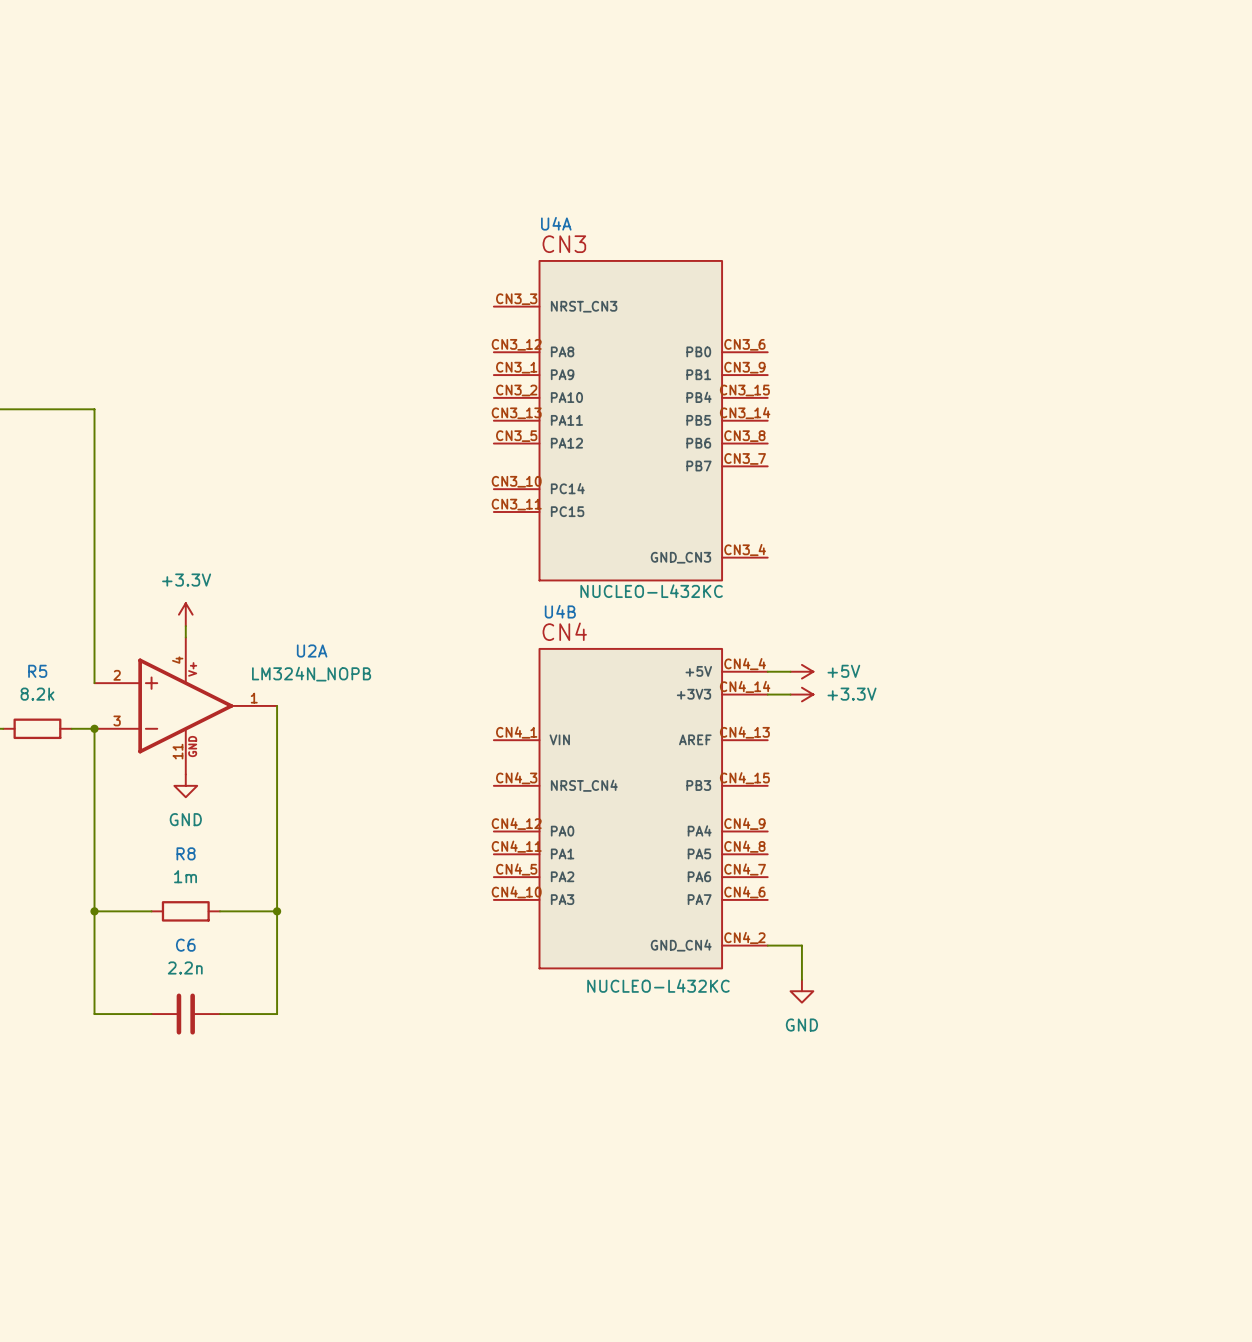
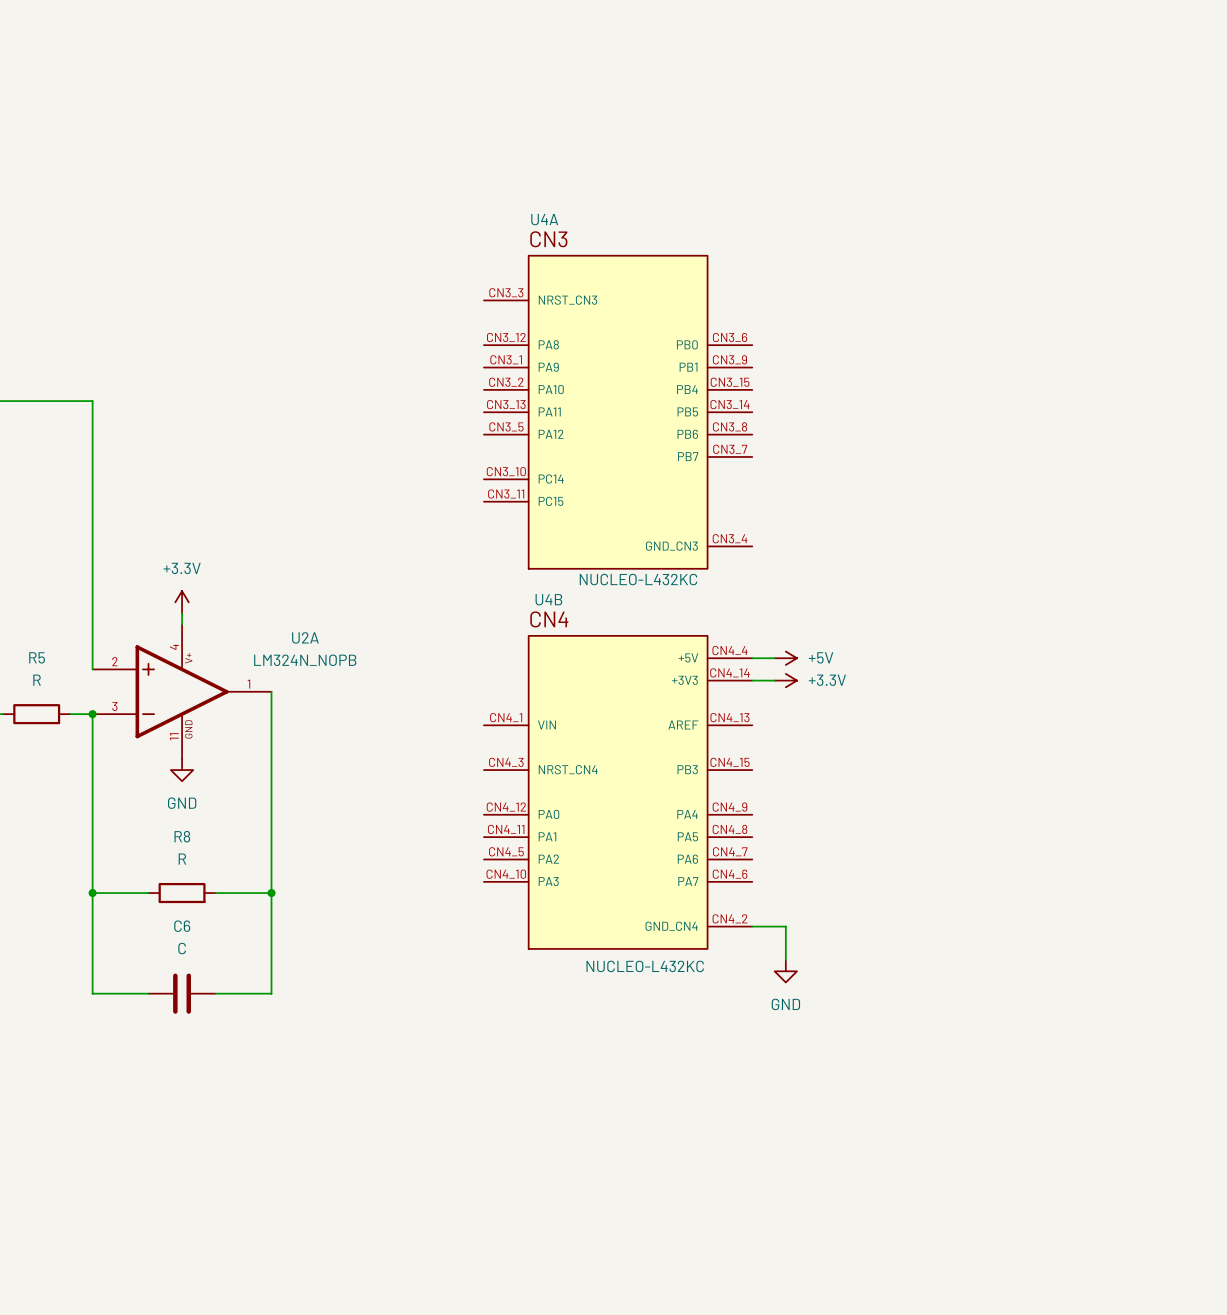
R5 value: 8.2k (37, 694) -> R (37, 680)
R8 value: 1m (185, 876) -> R (182, 859)
C6 value: 2.2n (185, 967) -> C (182, 948)

